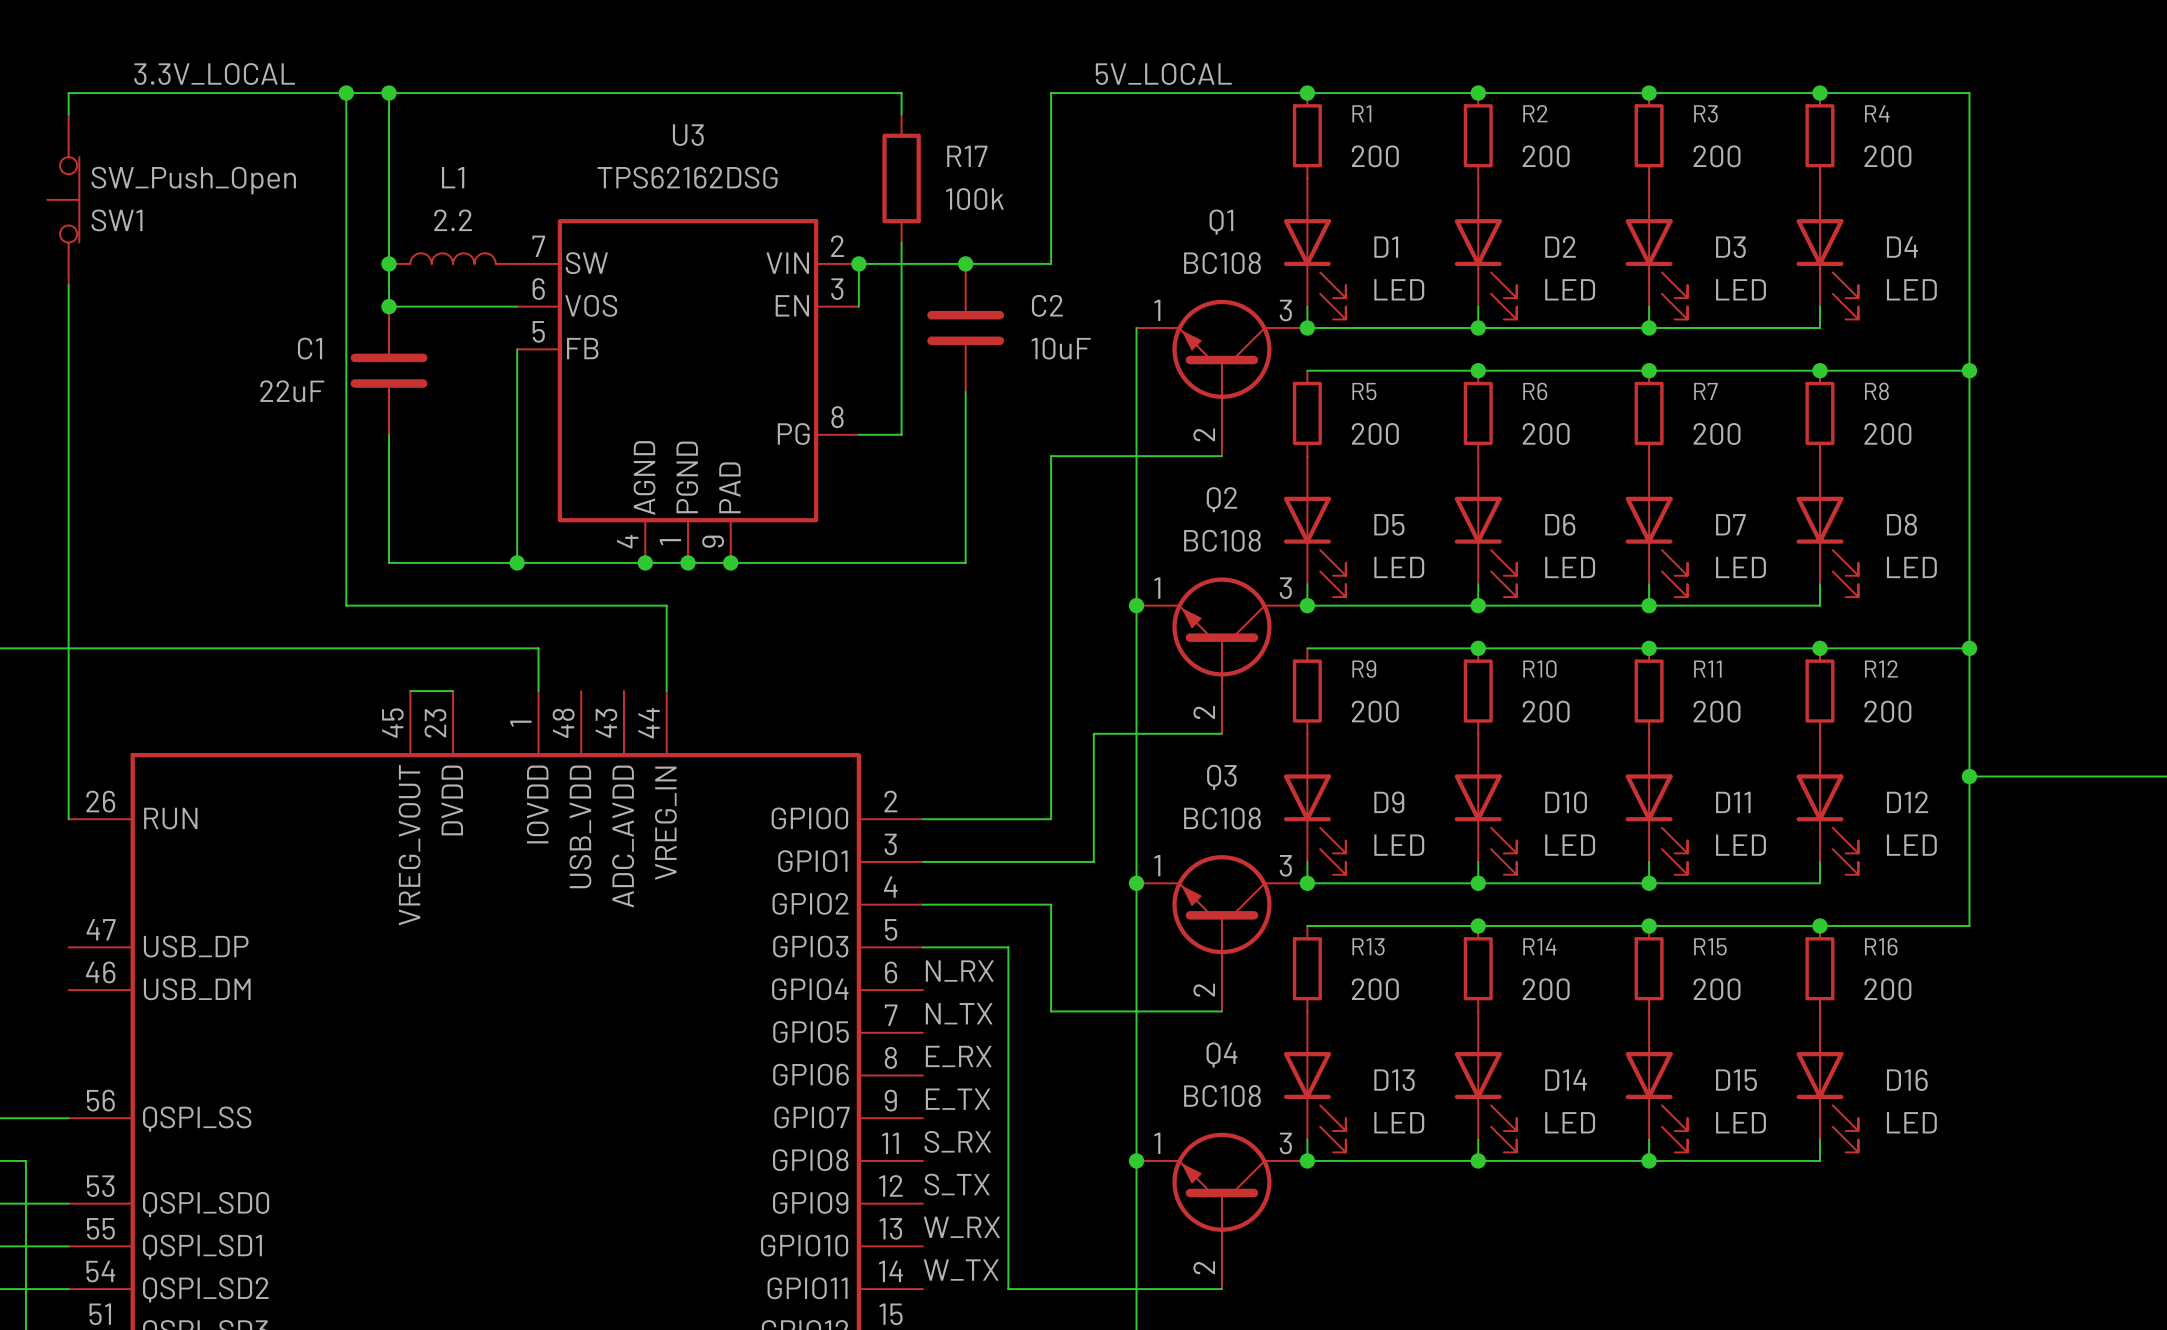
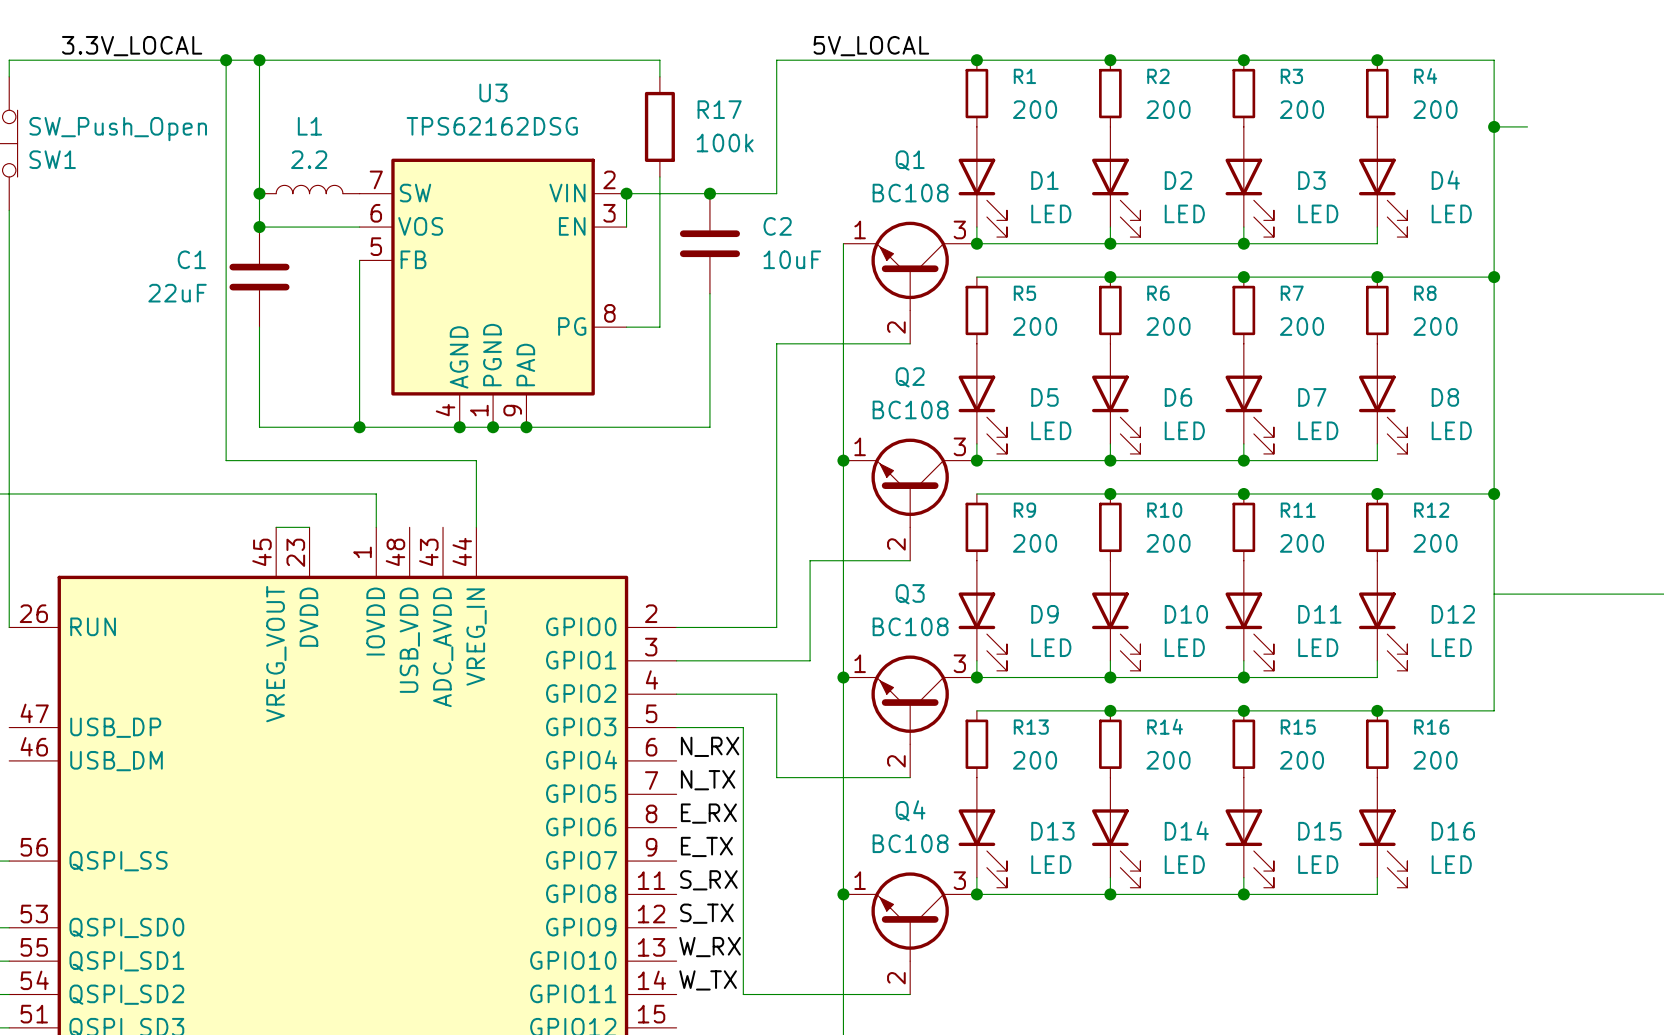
wire: none -> (1494, 126) (1527, 126)
junction: none -> (1494, 126)
junction: (1969, 776) -> none

